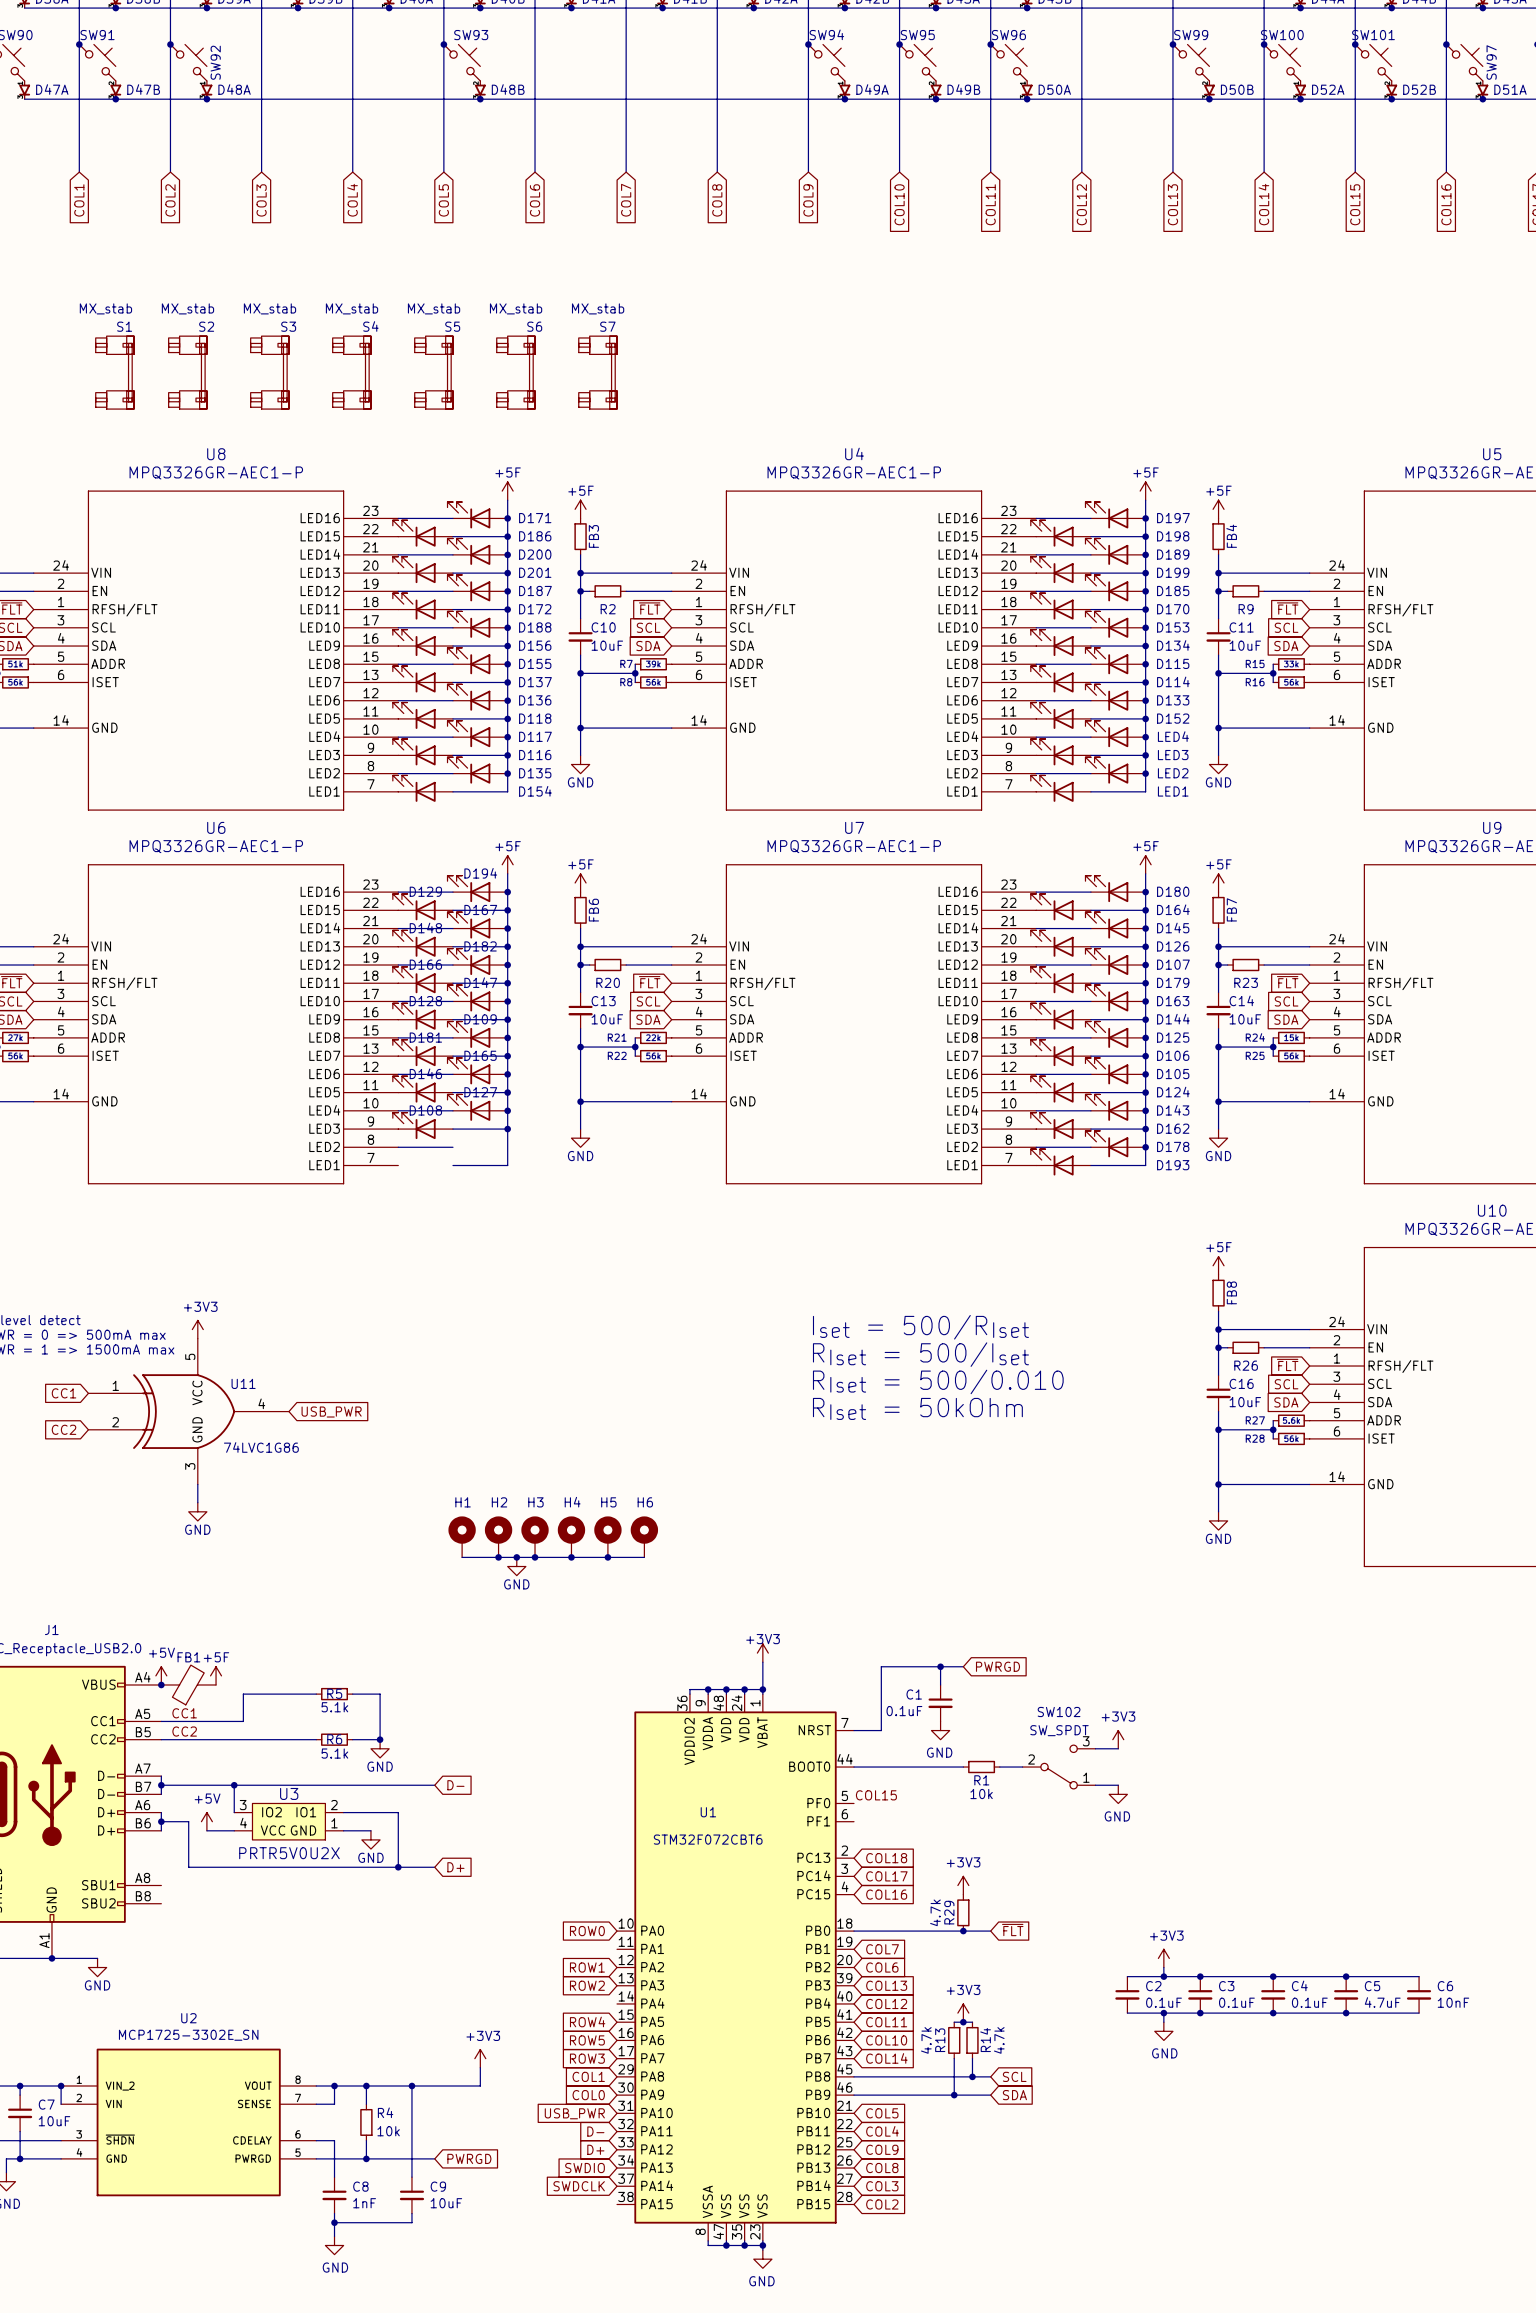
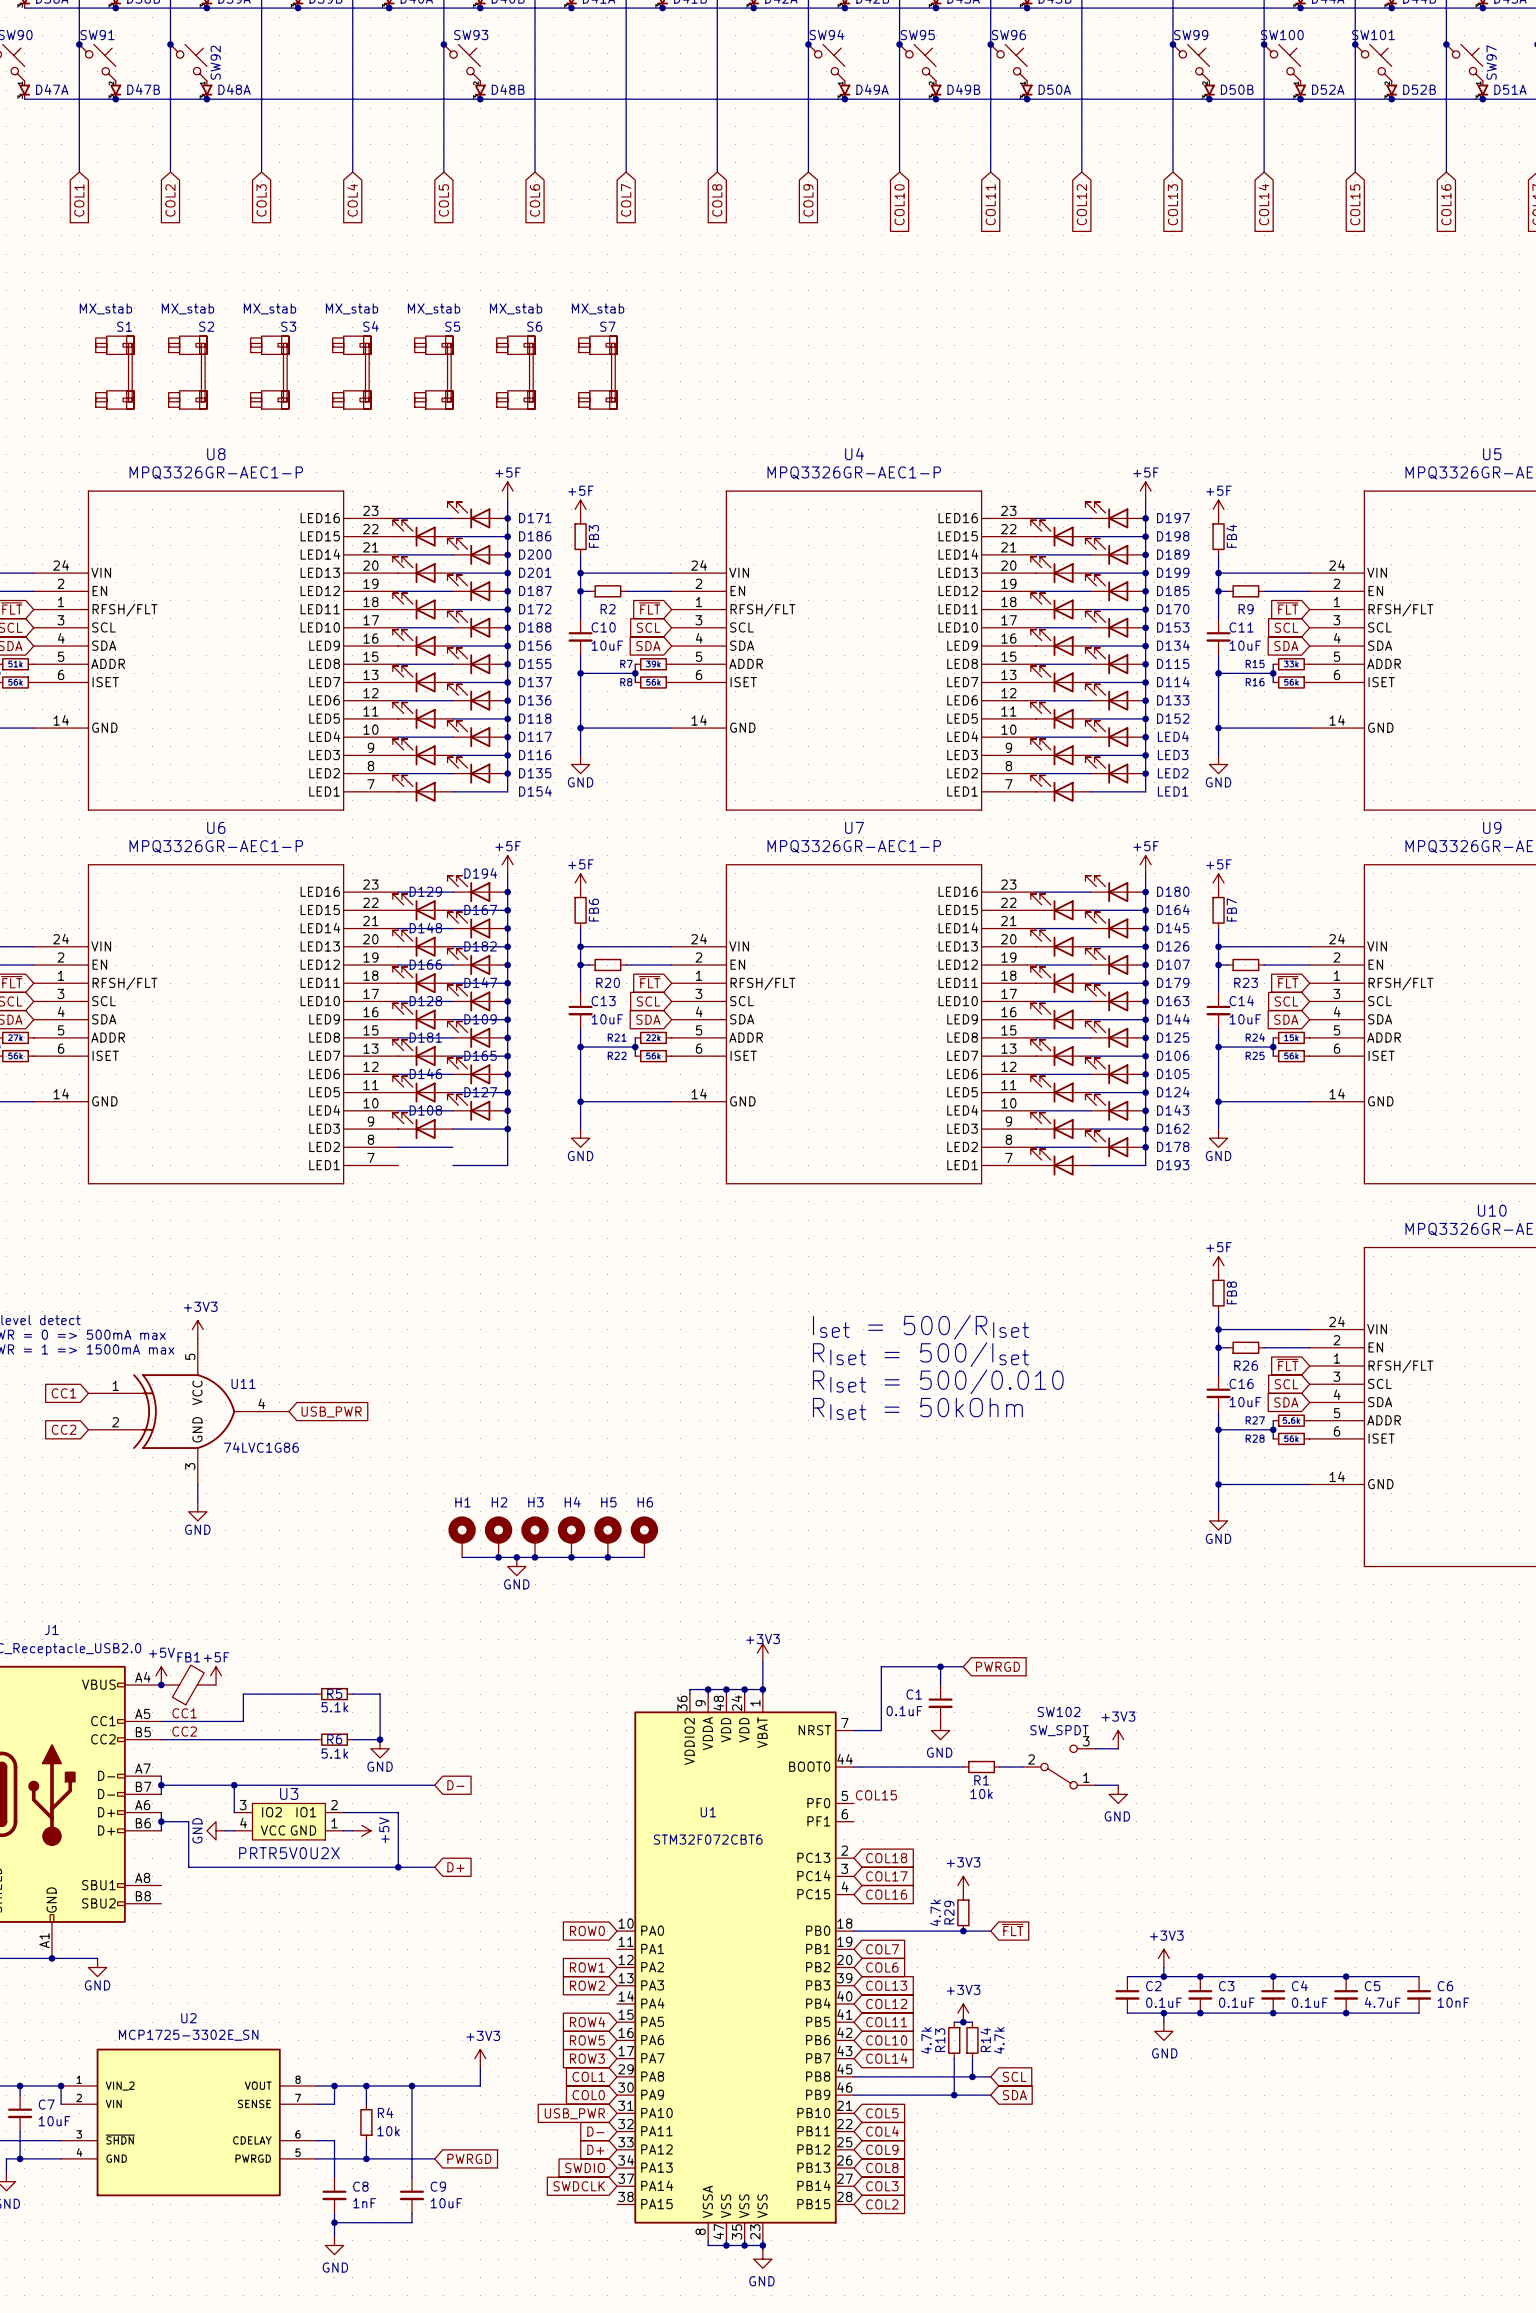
power symbol rotation: 0° (206, 1821) -> 90° clockwise (361, 1830)
power symbol position: +5V (206, 1821) -> +5V (361, 1830)
power symbol rotation: 0° (370, 1839) -> 90° clockwise (216, 1830)
power symbol position: GND (370, 1839) -> GND (216, 1830)

